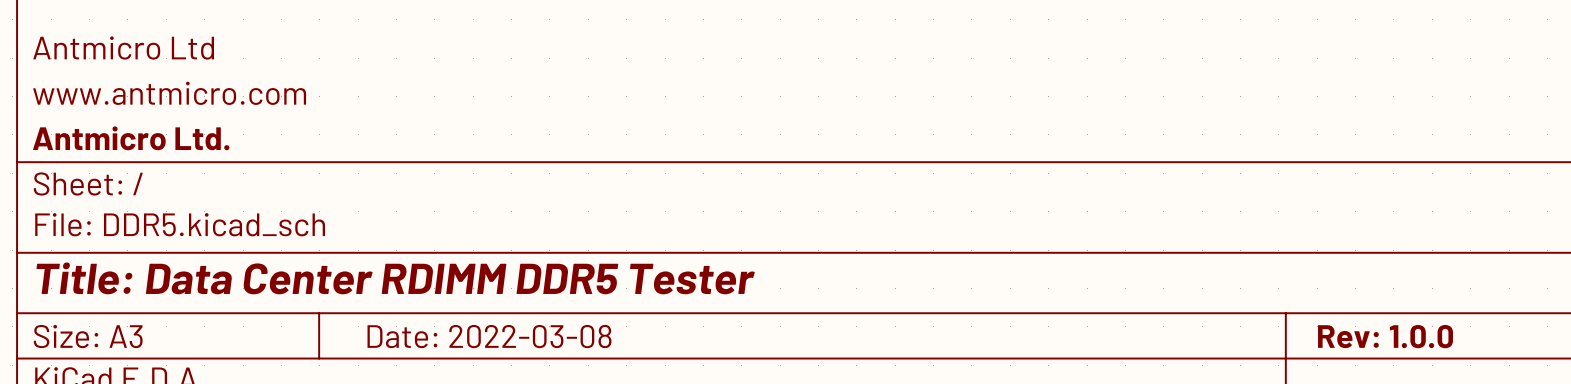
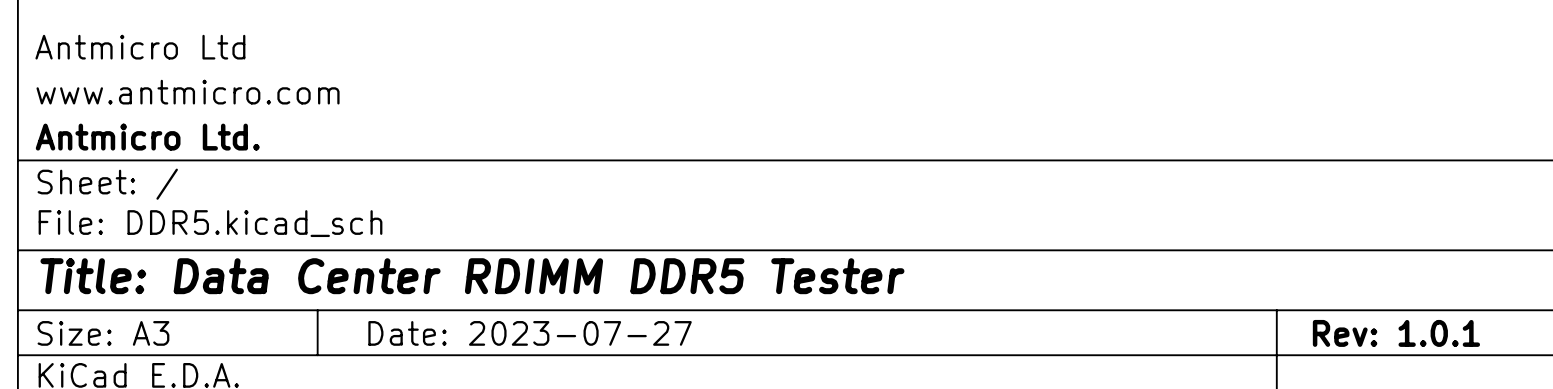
title block: Date: 2022-03-08 (489, 336) -> Date: 2023-07-27 (530, 333)
title block: Rev: 1.0.0 (1385, 336) -> Rev: 1.0.1 (1396, 333)

